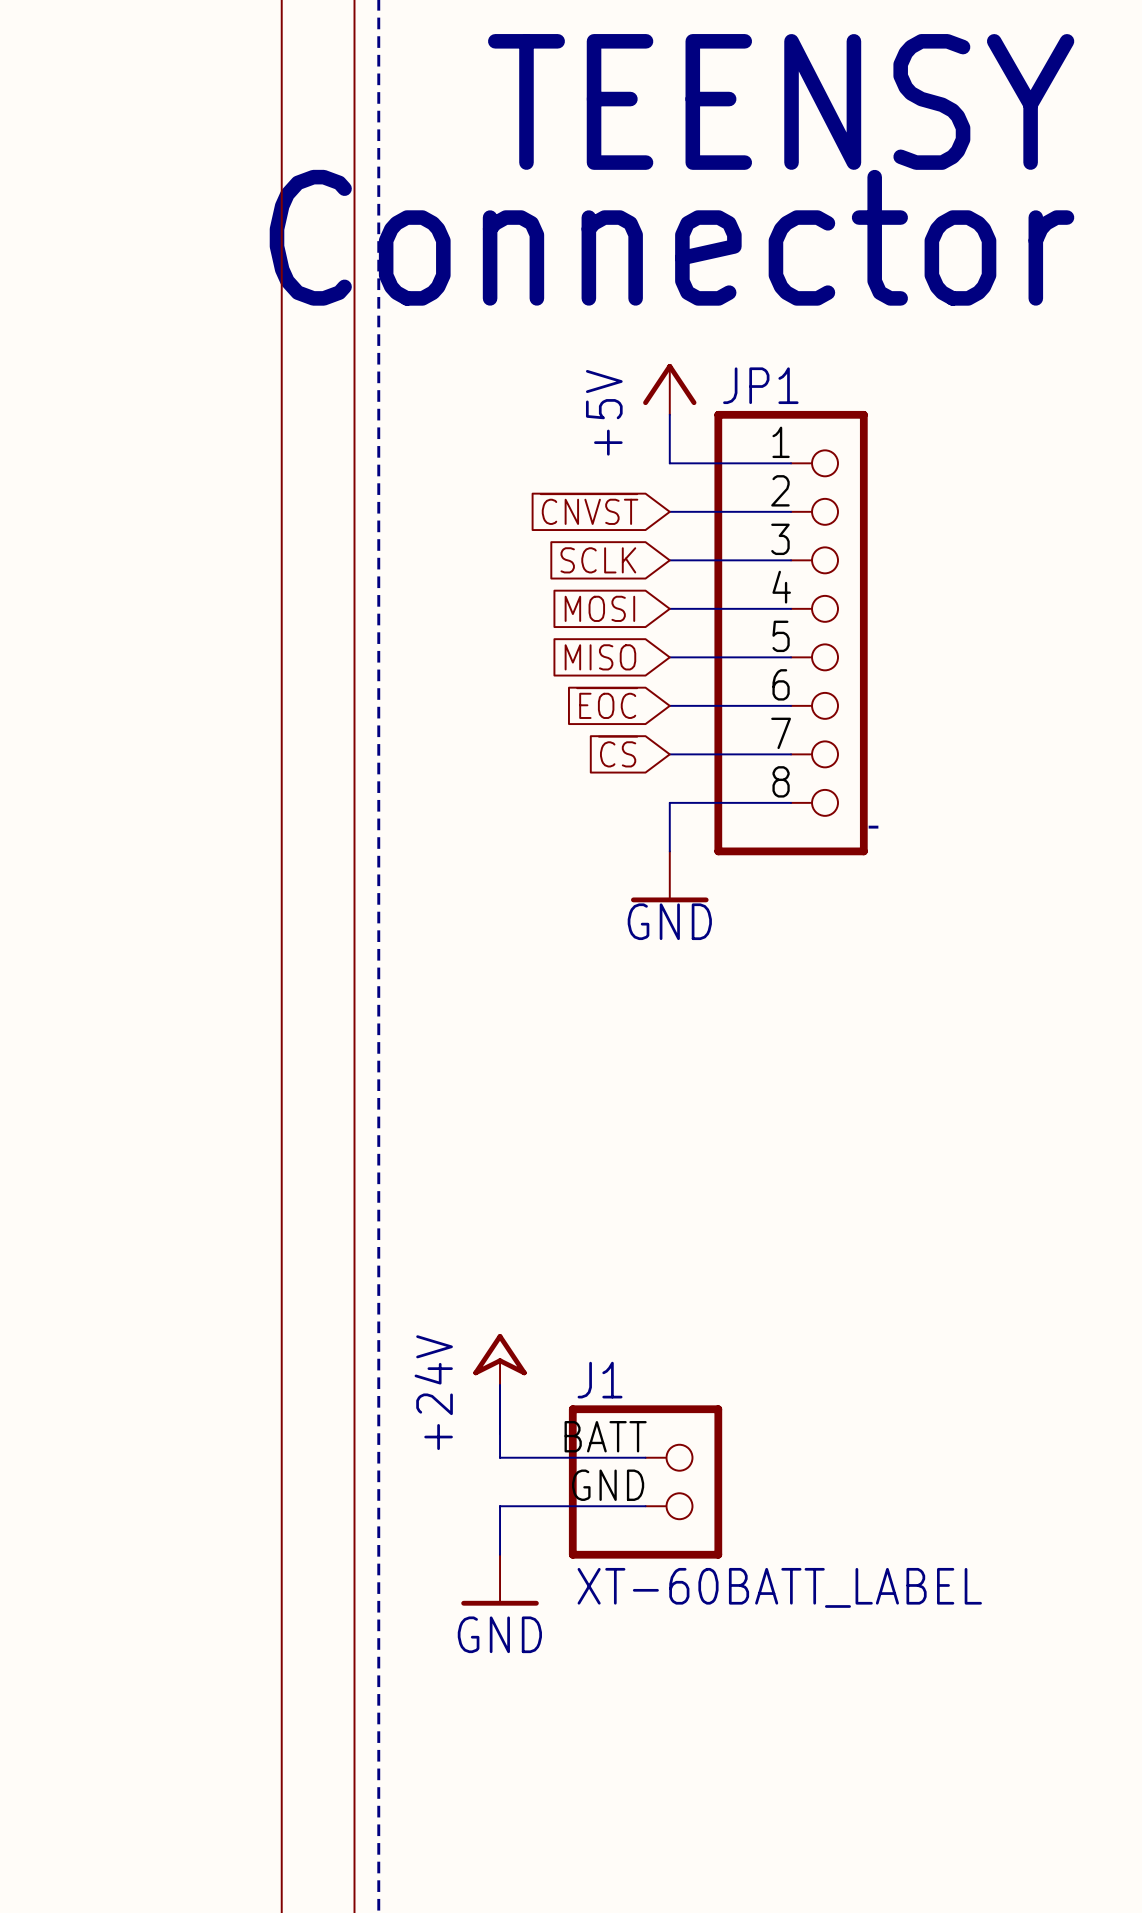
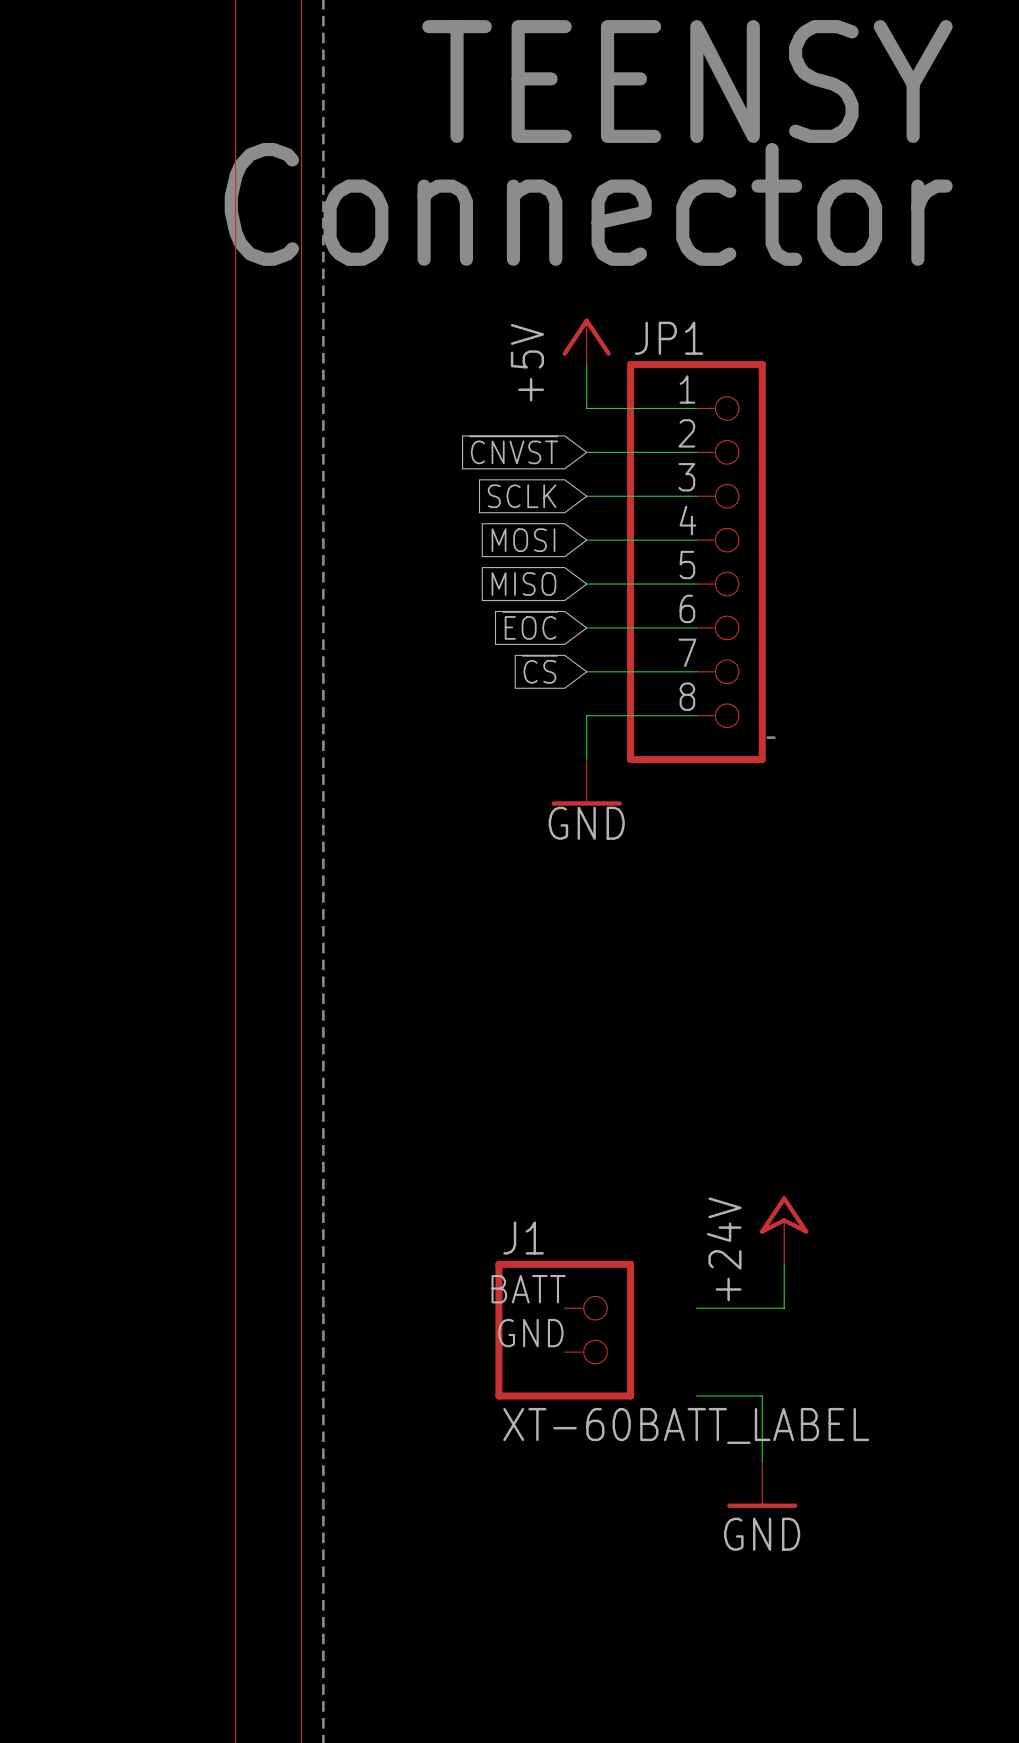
power symbol position: +24V (500, 1371) -> +24V (784, 1230)
wire: (500, 1384) (500, 1457) (645, 1457) -> none
wire: none -> (784, 1264) (784, 1308) (696, 1308)
wire: (645, 1506) (500, 1506) (500, 1554) -> none
wire: none -> (696, 1395) (762, 1395) (762, 1461)
power symbol position: GND (500, 1580) -> GND (762, 1484)

